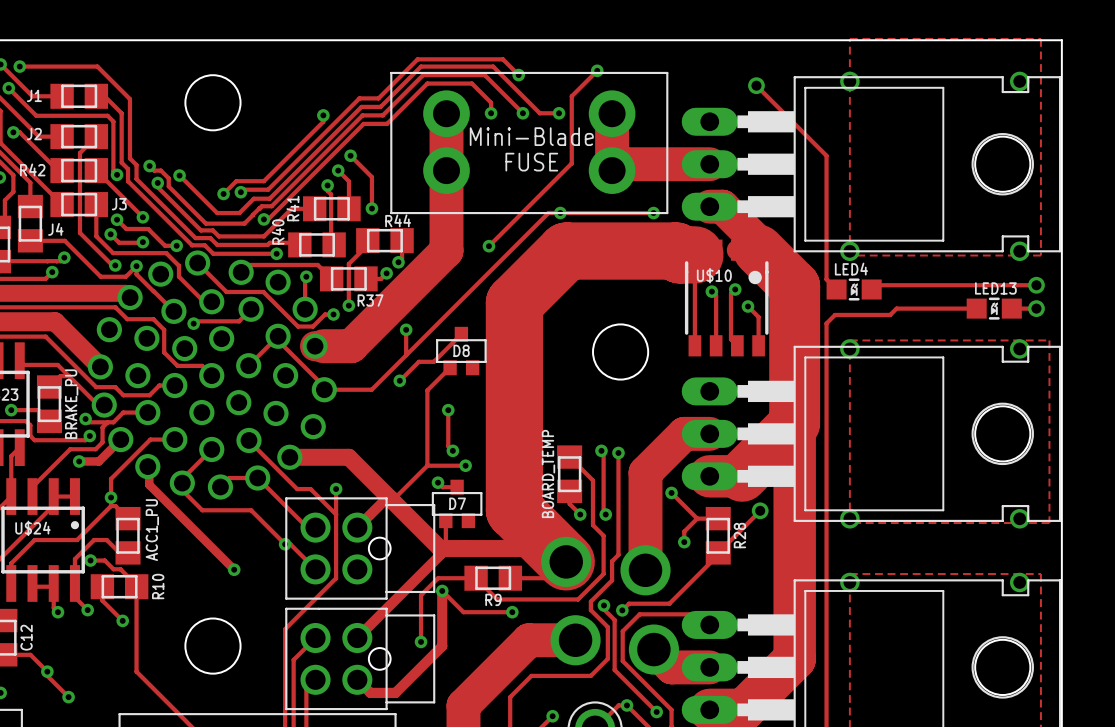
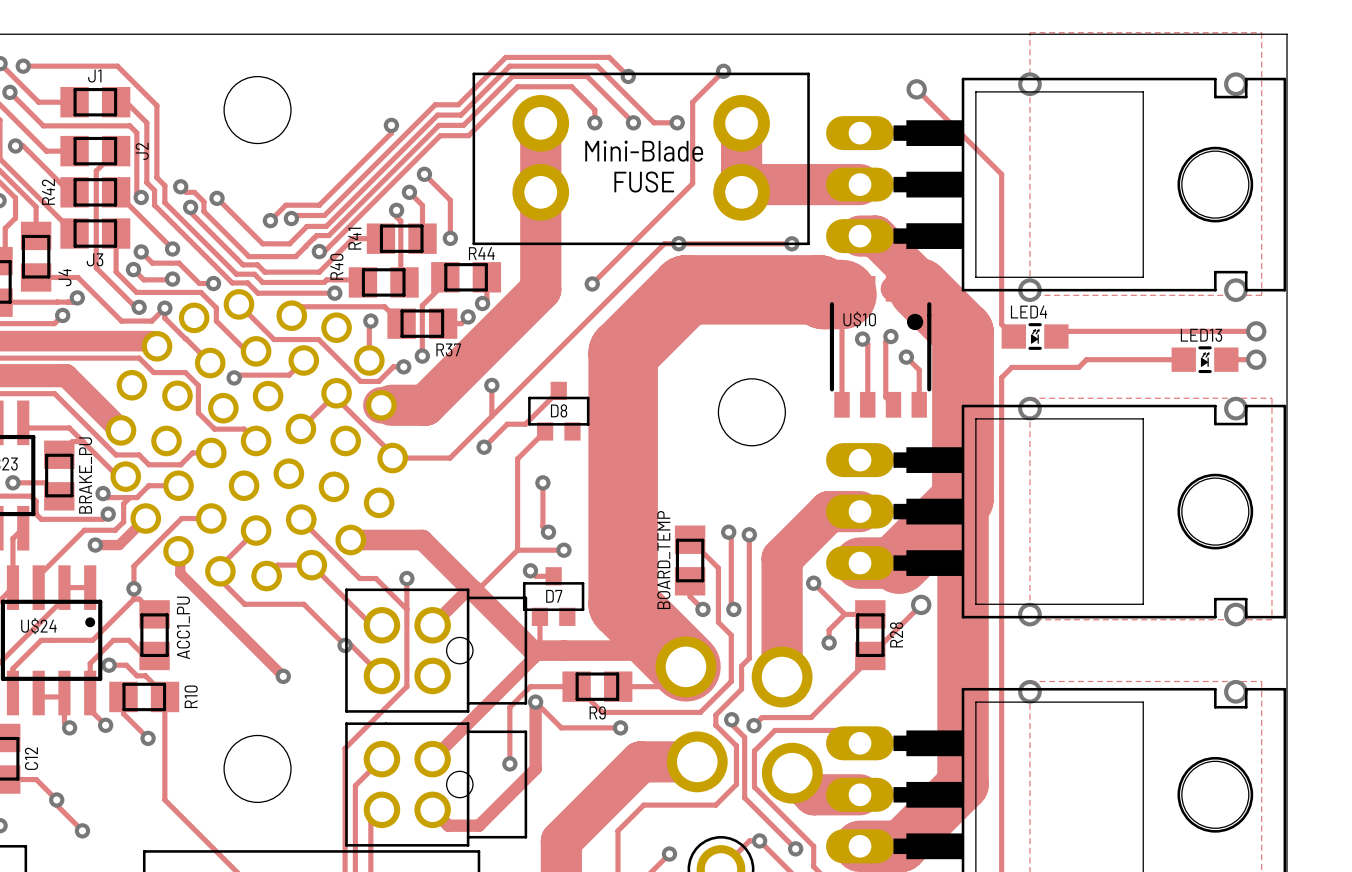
J1 name position: J1 (34, 95) -> J1 (94, 76)
J2 name rotation: 0° (34, 134) -> 90° counterclockwise (142, 151)
J2 name position: J2 (34, 134) -> J2 (142, 151)
R42 name rotation: 0° (32, 169) -> 90° counterclockwise (48, 192)
J3 name position: J3 (119, 204) -> J3 (95, 259)
J4 name rotation: 0° (55, 229) -> 90° counterclockwise (65, 277)

